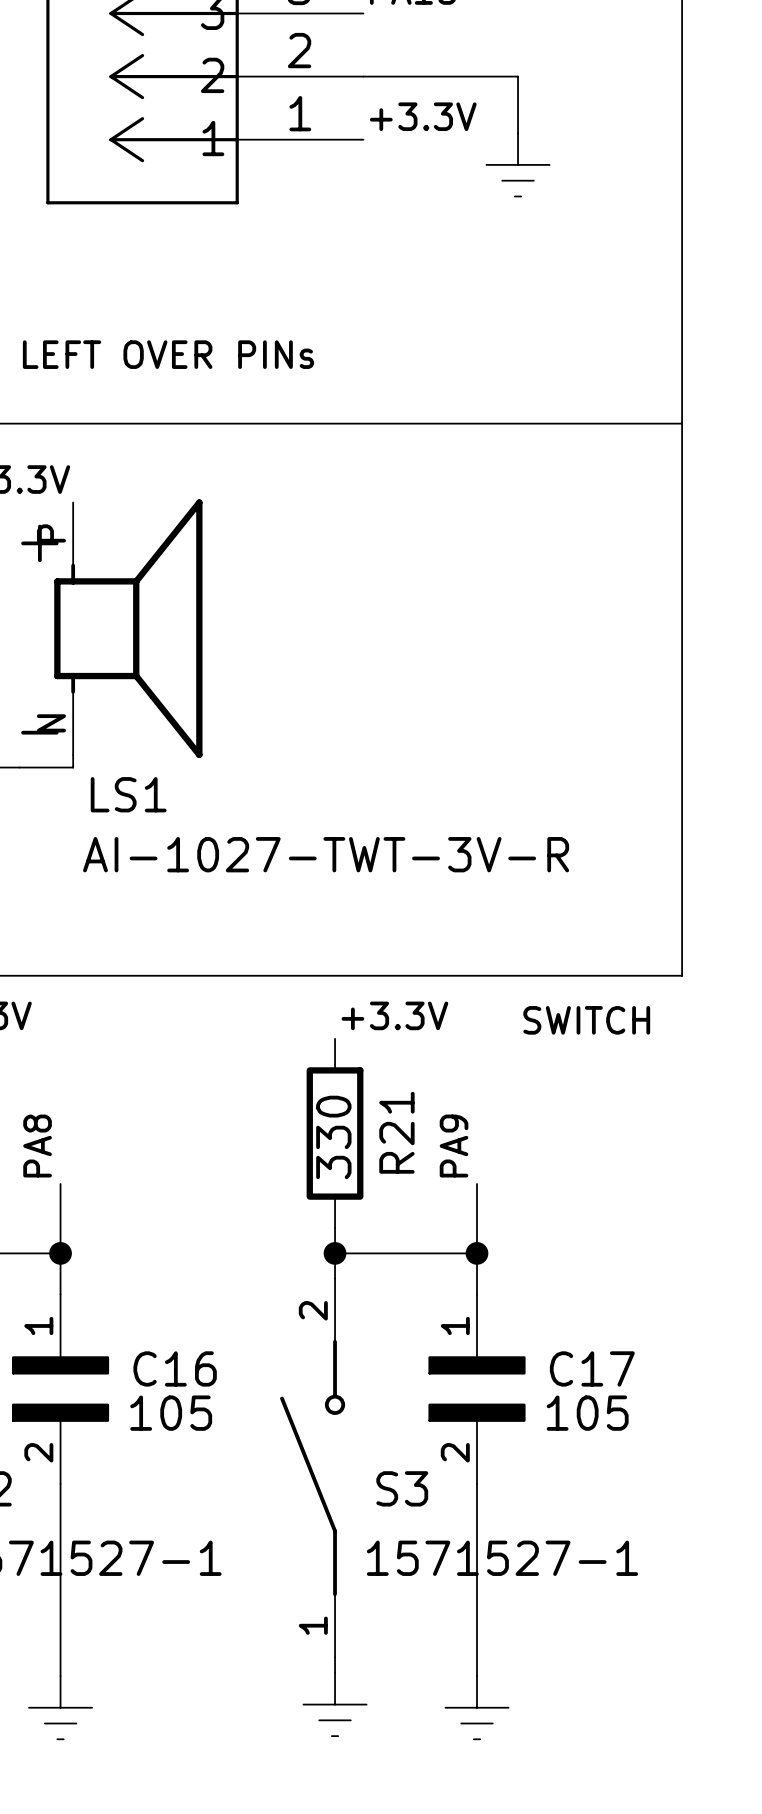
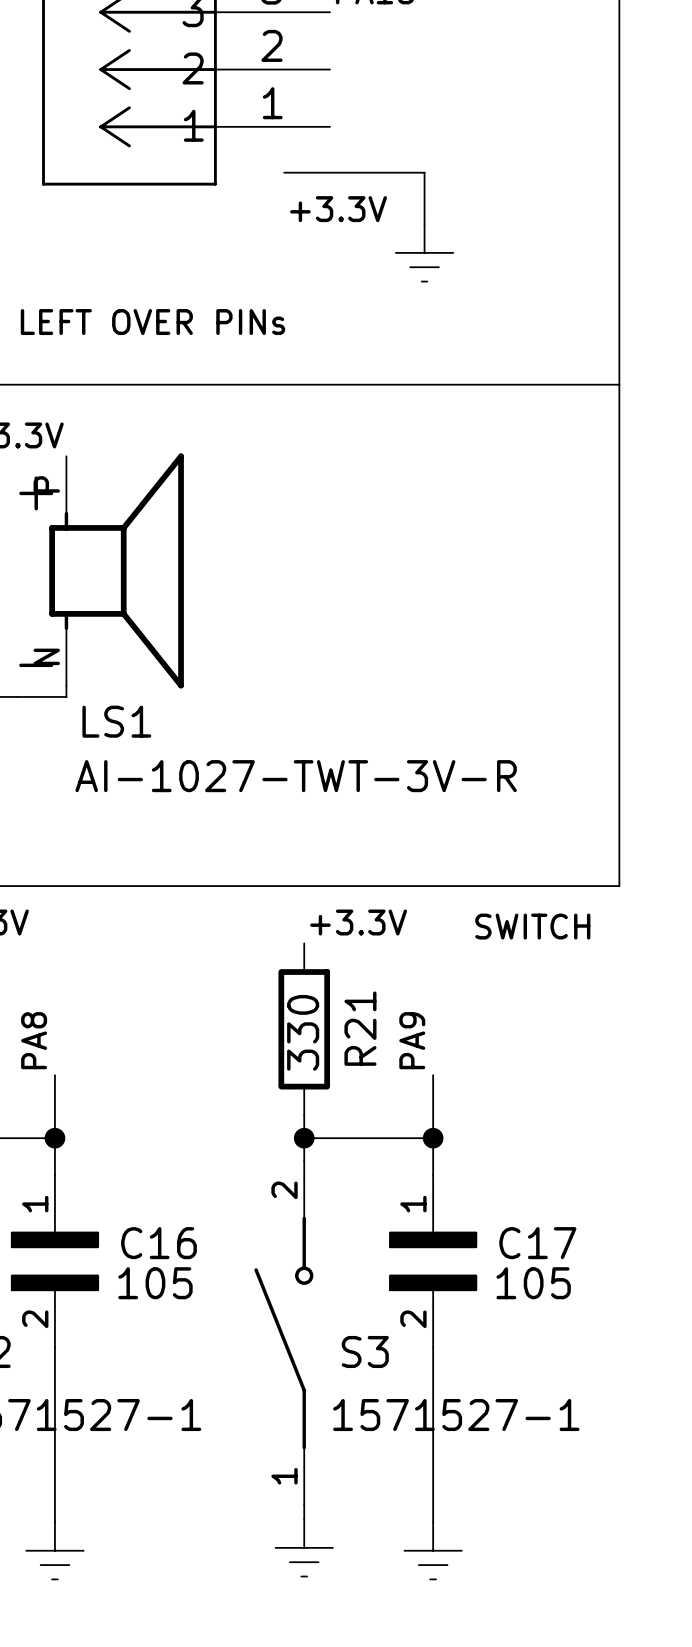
wire: (363, 76) (518, 76) (518, 133) -> (284, 172) (424, 172) (424, 224)
label position: +3.3V (423, 116) -> +3.3V (338, 209)
power symbol position: (518, 164) -> (424, 252)

